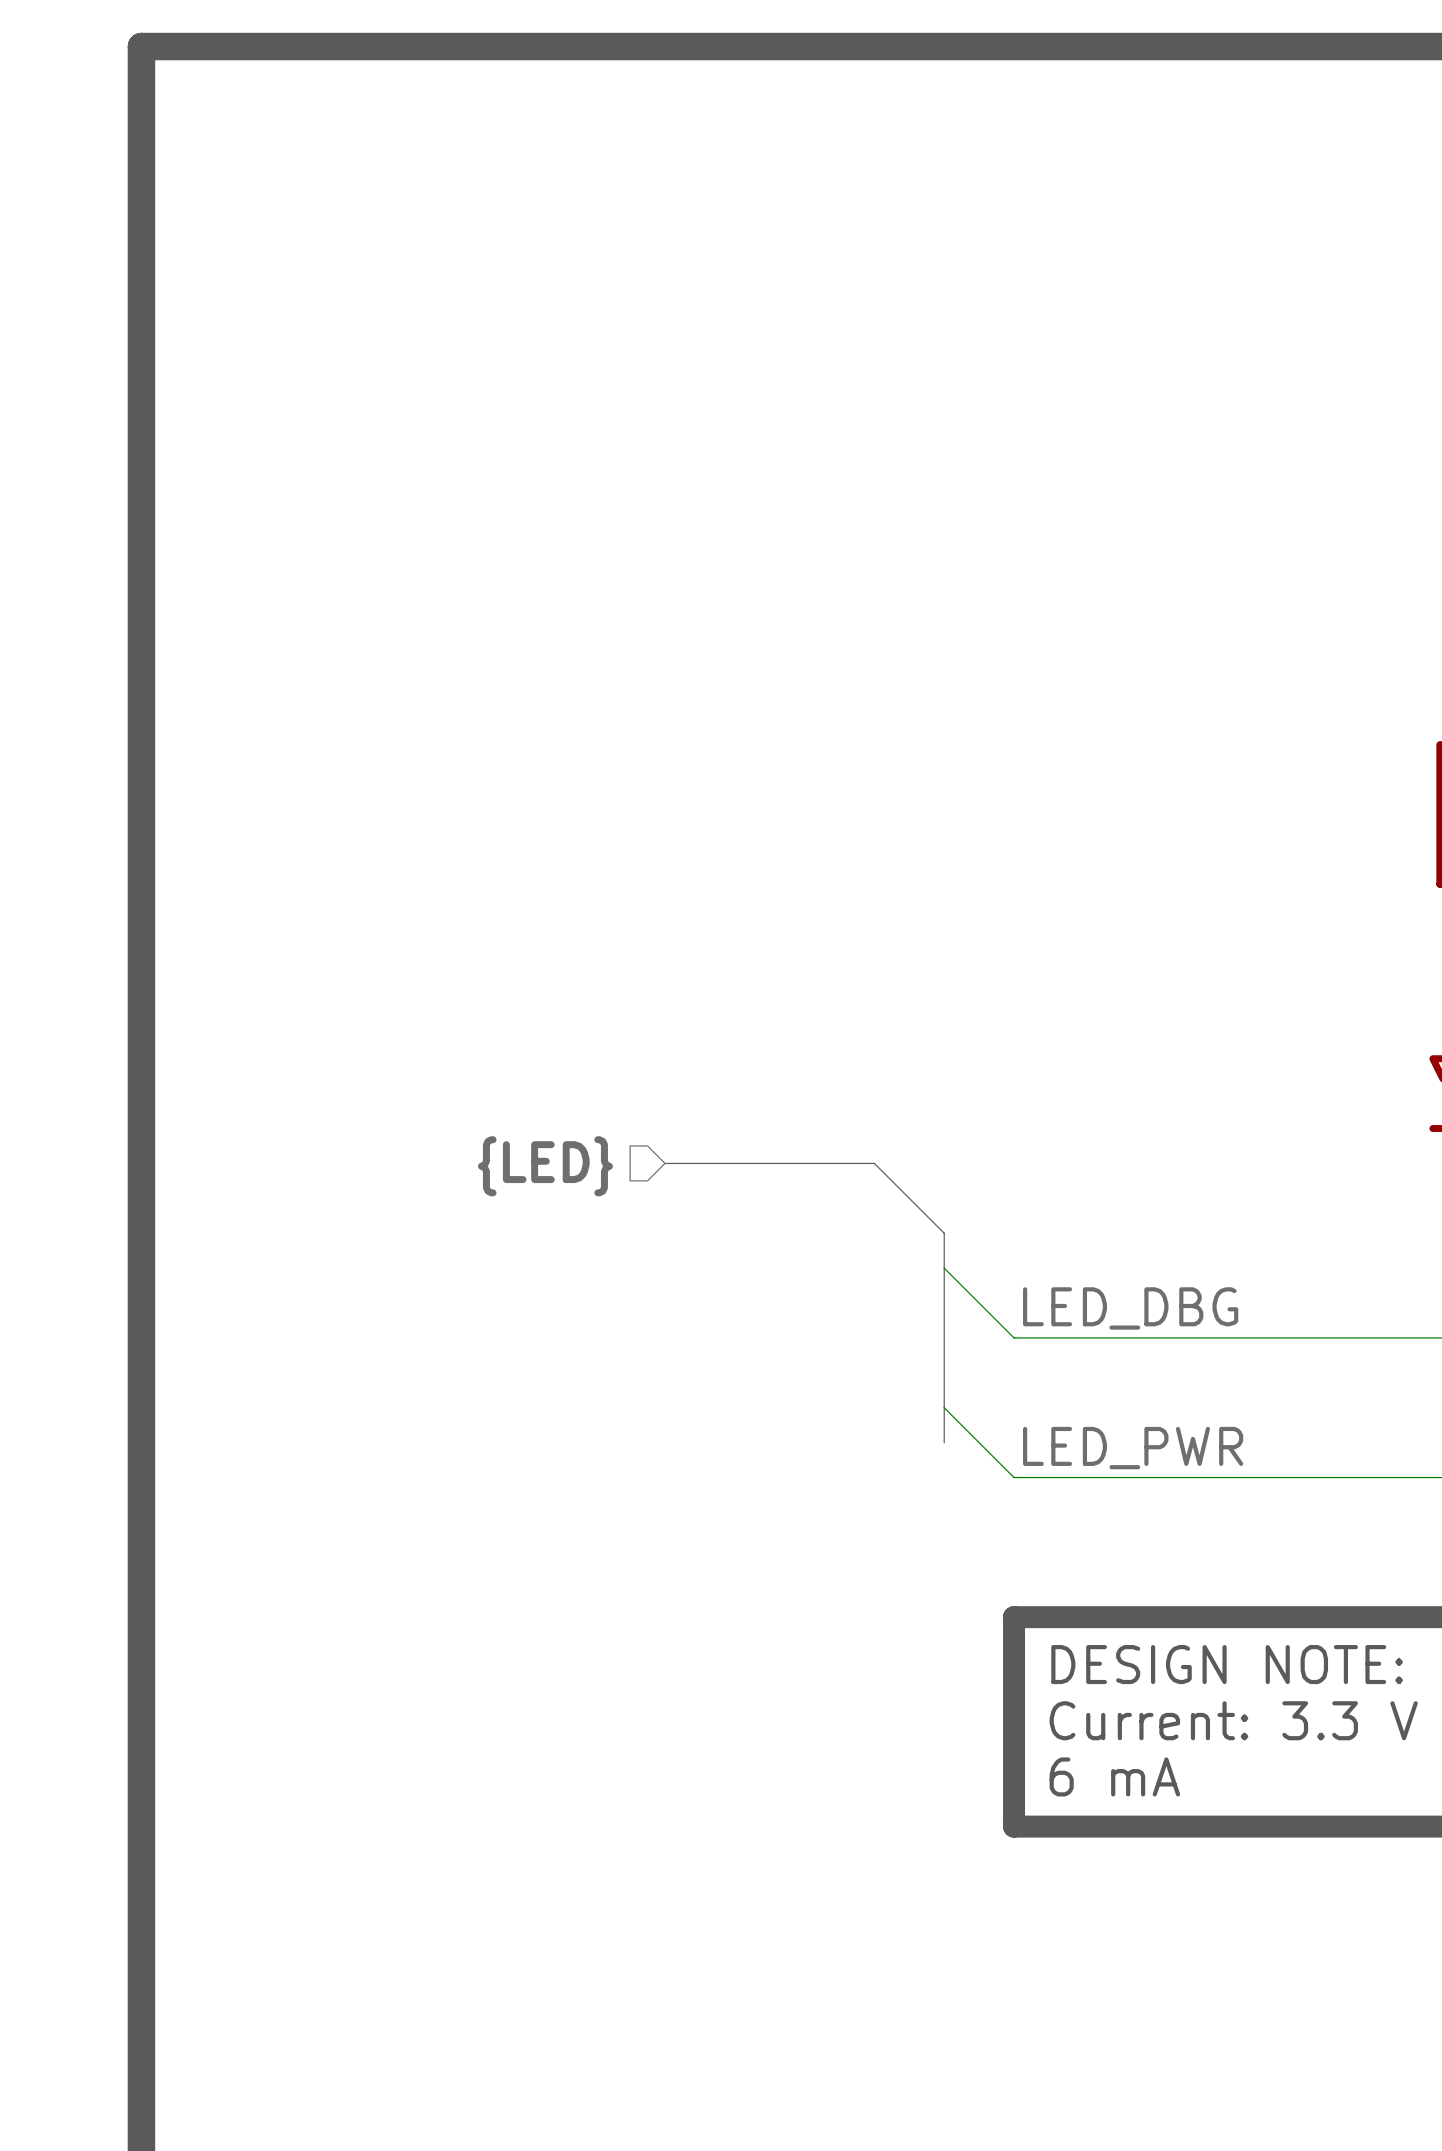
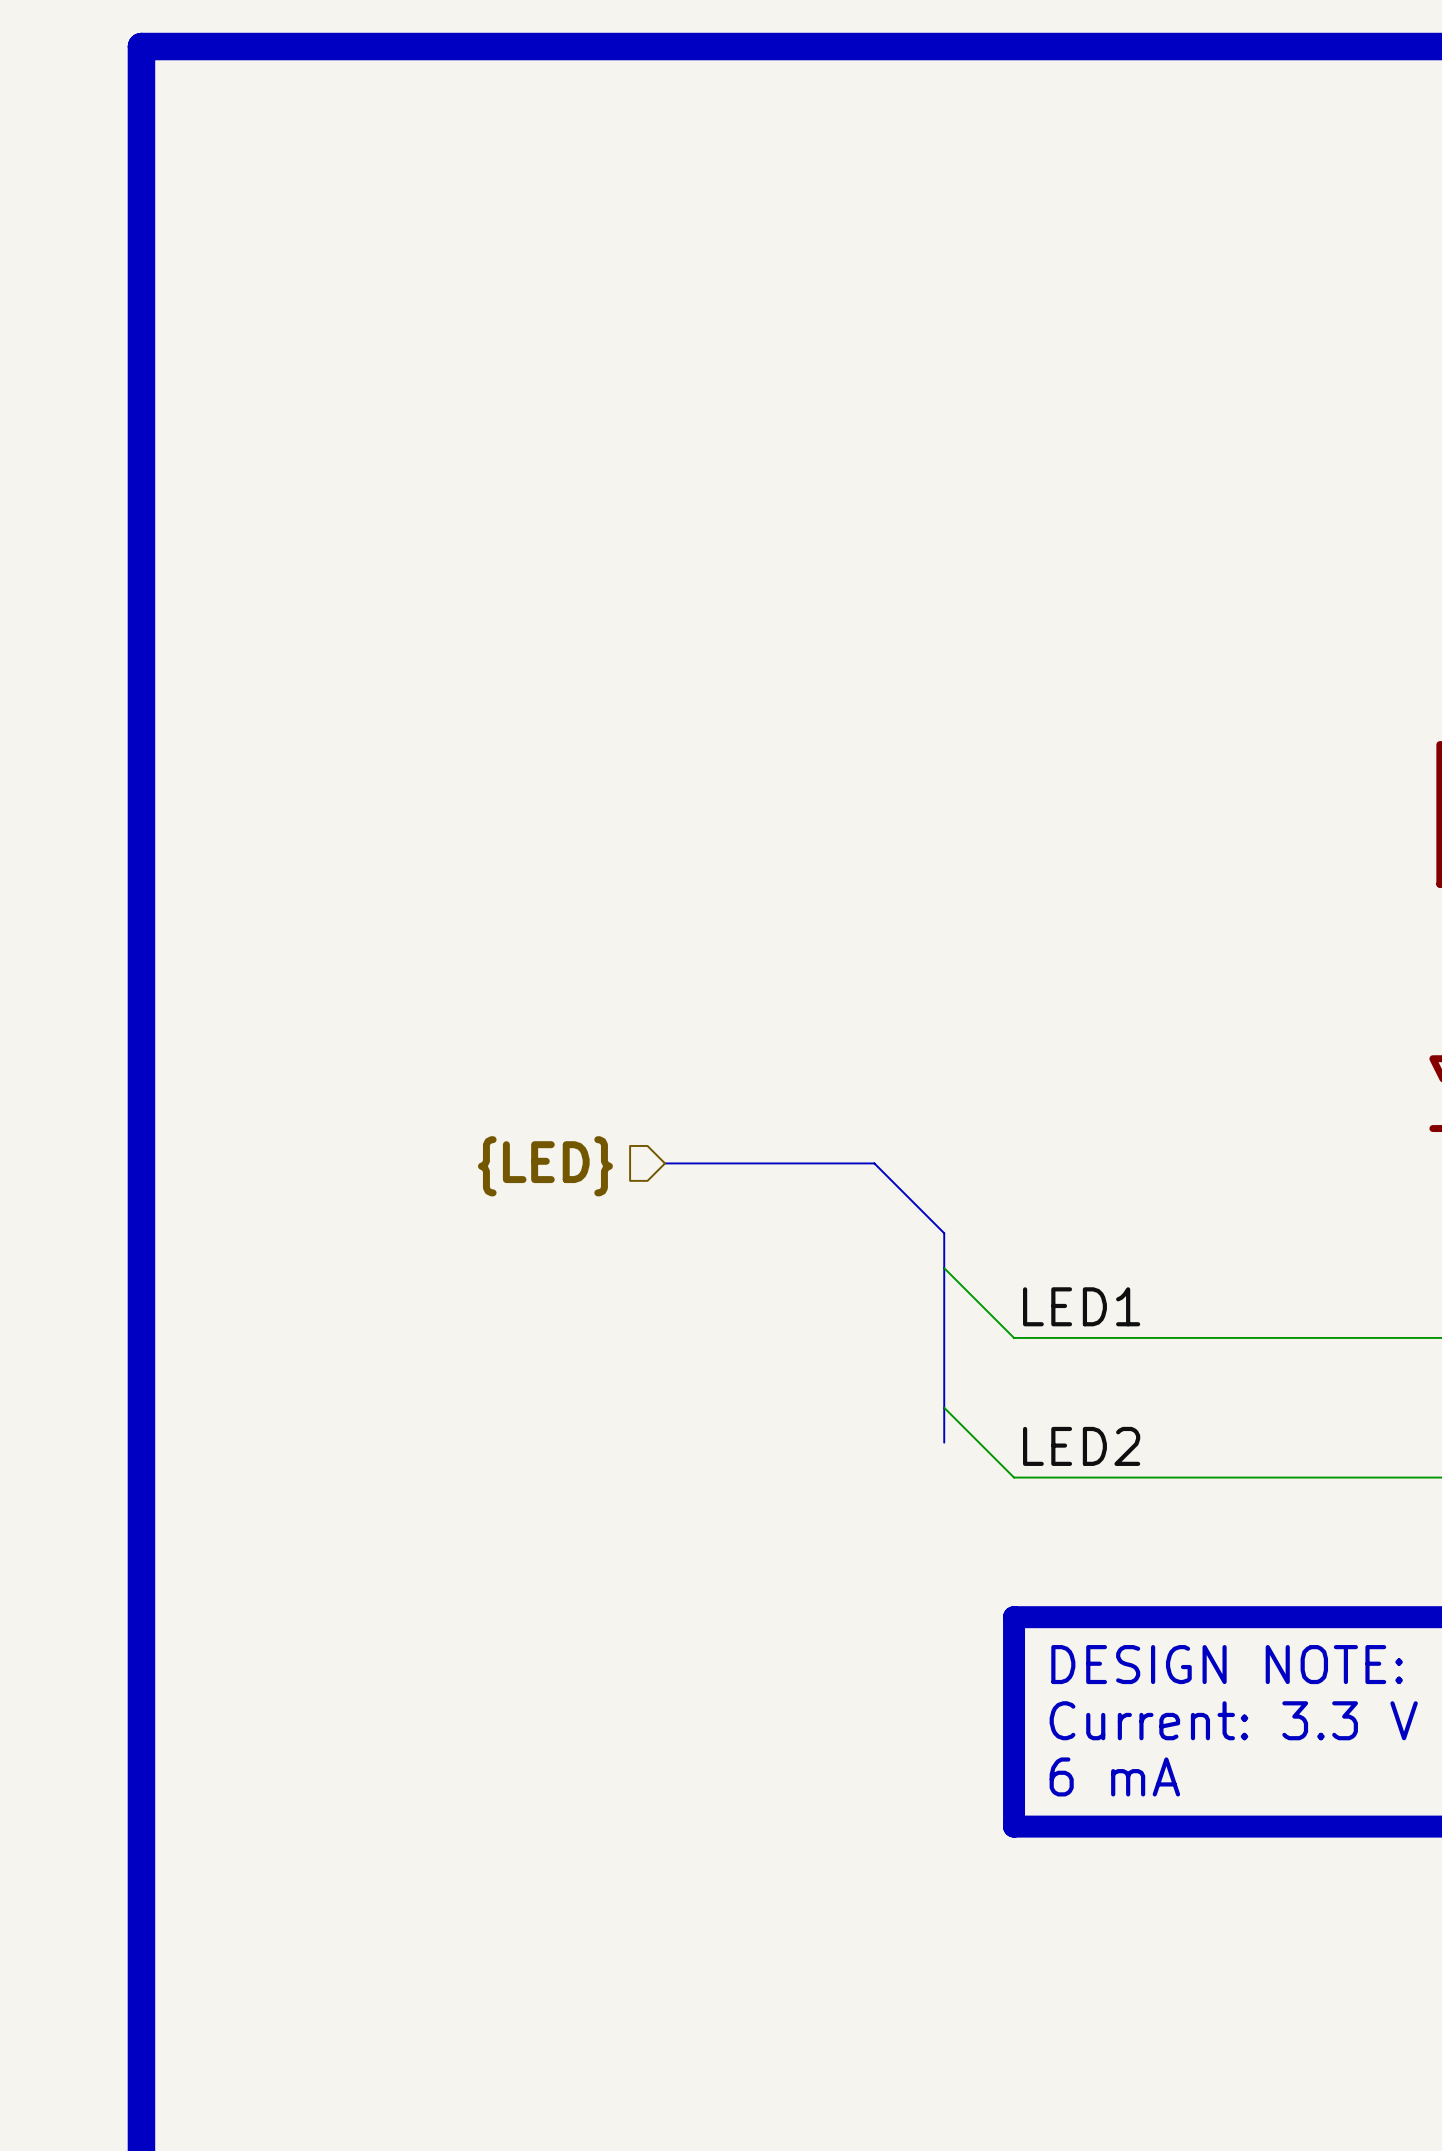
label: LED_DBG (1130, 1308) -> LED1 (1081, 1306)
label: LED_PWR (1133, 1448) -> LED2 (1081, 1446)

